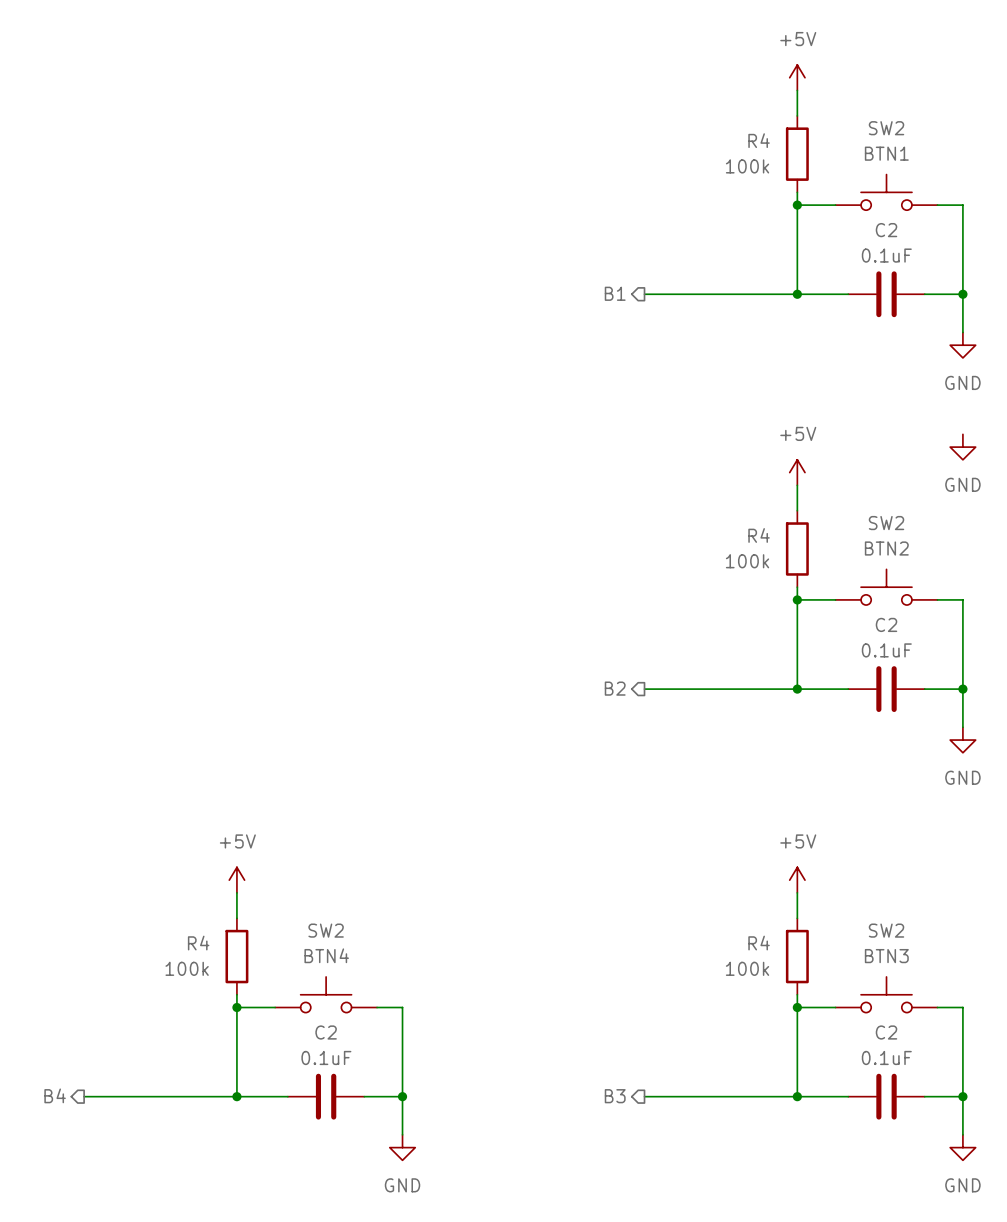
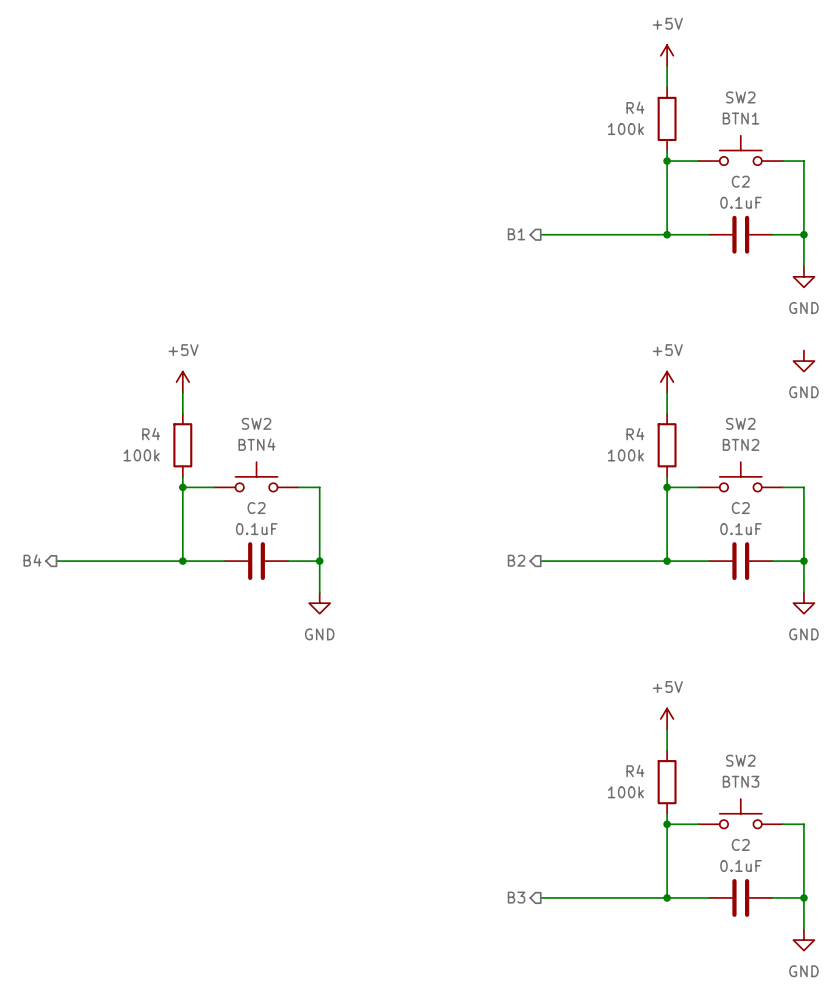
power symbol: none -> +5V (182, 382)
wire: none -> (182, 392) (182, 413)
R4: none -> 100k (182, 445)
wire: none -> (182, 476) (182, 561)
SW2: none -> BTN4 (256, 476)
wire: none -> (182, 487) (214, 487)
junction: none -> (182, 487)
wire: none -> (298, 487) (319, 487) (319, 592)
hierarchical label: none -> B4 (32, 560)
wire: none -> (56, 561) (224, 561)
junction: none -> (182, 561)
C2: none -> 0.1uF (256, 561)
wire: none -> (288, 561) (319, 561)
junction: none -> (319, 561)
power symbol: none -> GND (319, 603)
power symbol: +5V (236, 880) -> none
wire: (236, 892) (236, 918) -> none
R4: 100k (236, 956) -> none
wire: (236, 994) (236, 1096) -> none
SW2: BTN4 (326, 994) -> none
wire: (236, 1007) (275, 1007) -> none
junction: (236, 1007) -> none
wire: (377, 1007) (402, 1007) (402, 1134) -> none
hierarchical label: B4 (55, 1095) -> none
wire: (84, 1096) (287, 1096) -> none
junction: (236, 1096) -> none
C2: 0.1uF (326, 1096) -> none
wire: (364, 1096) (402, 1096) -> none
junction: (402, 1096) -> none
power symbol: GND (402, 1147) -> none

